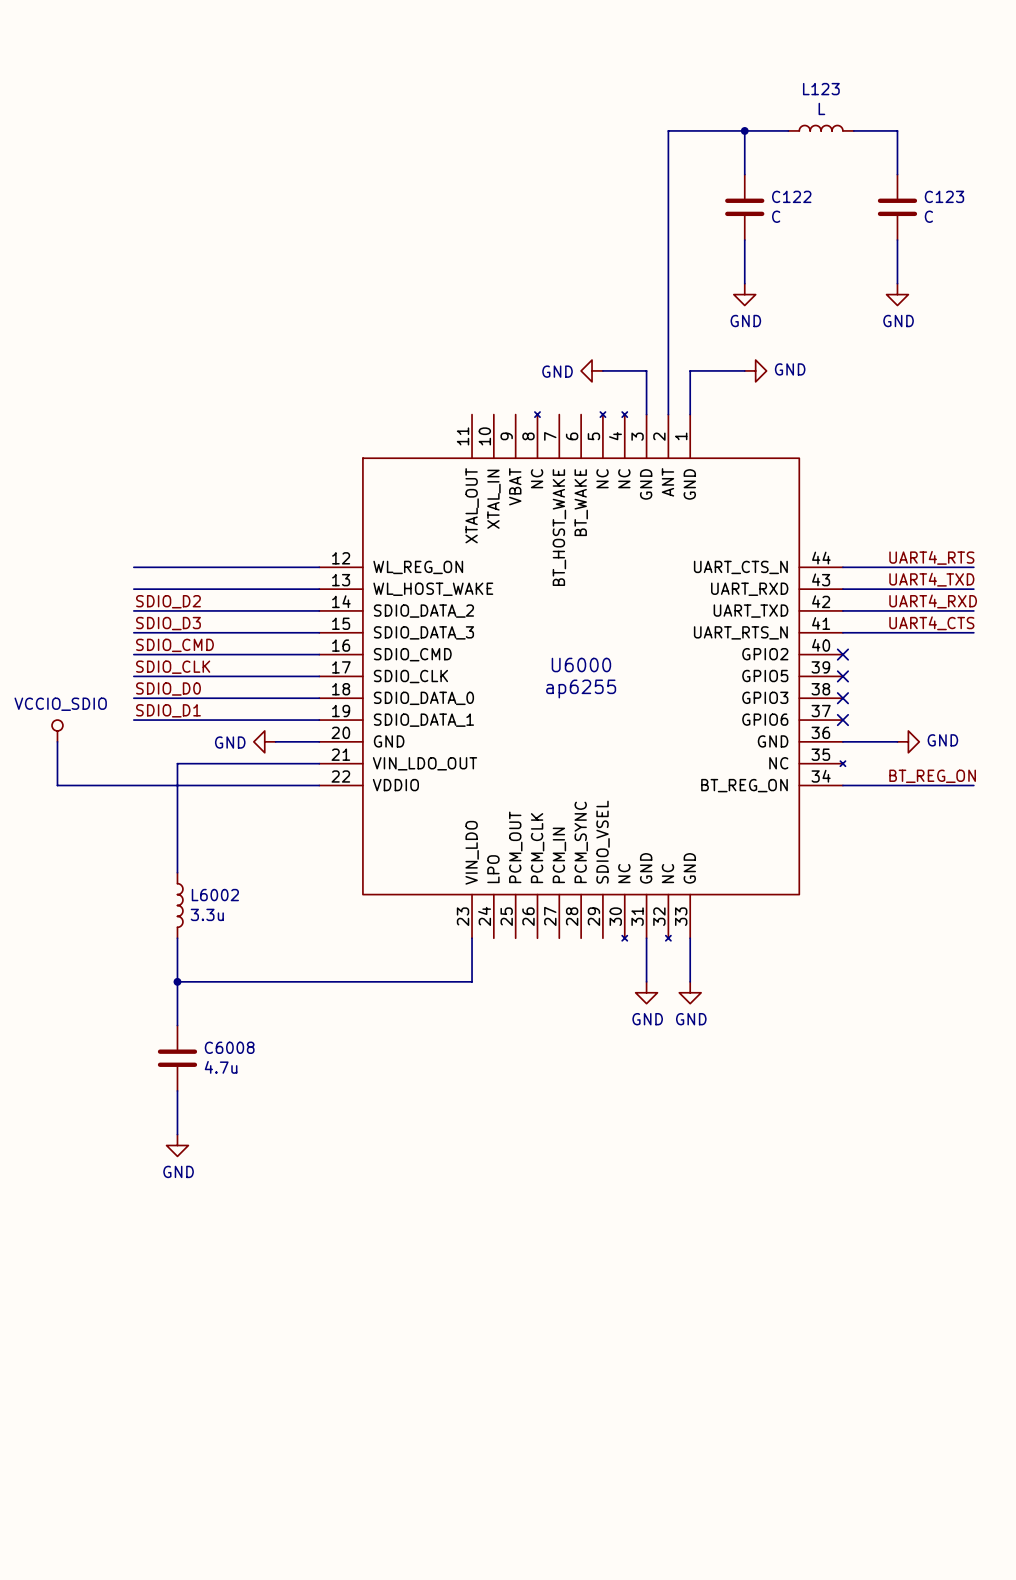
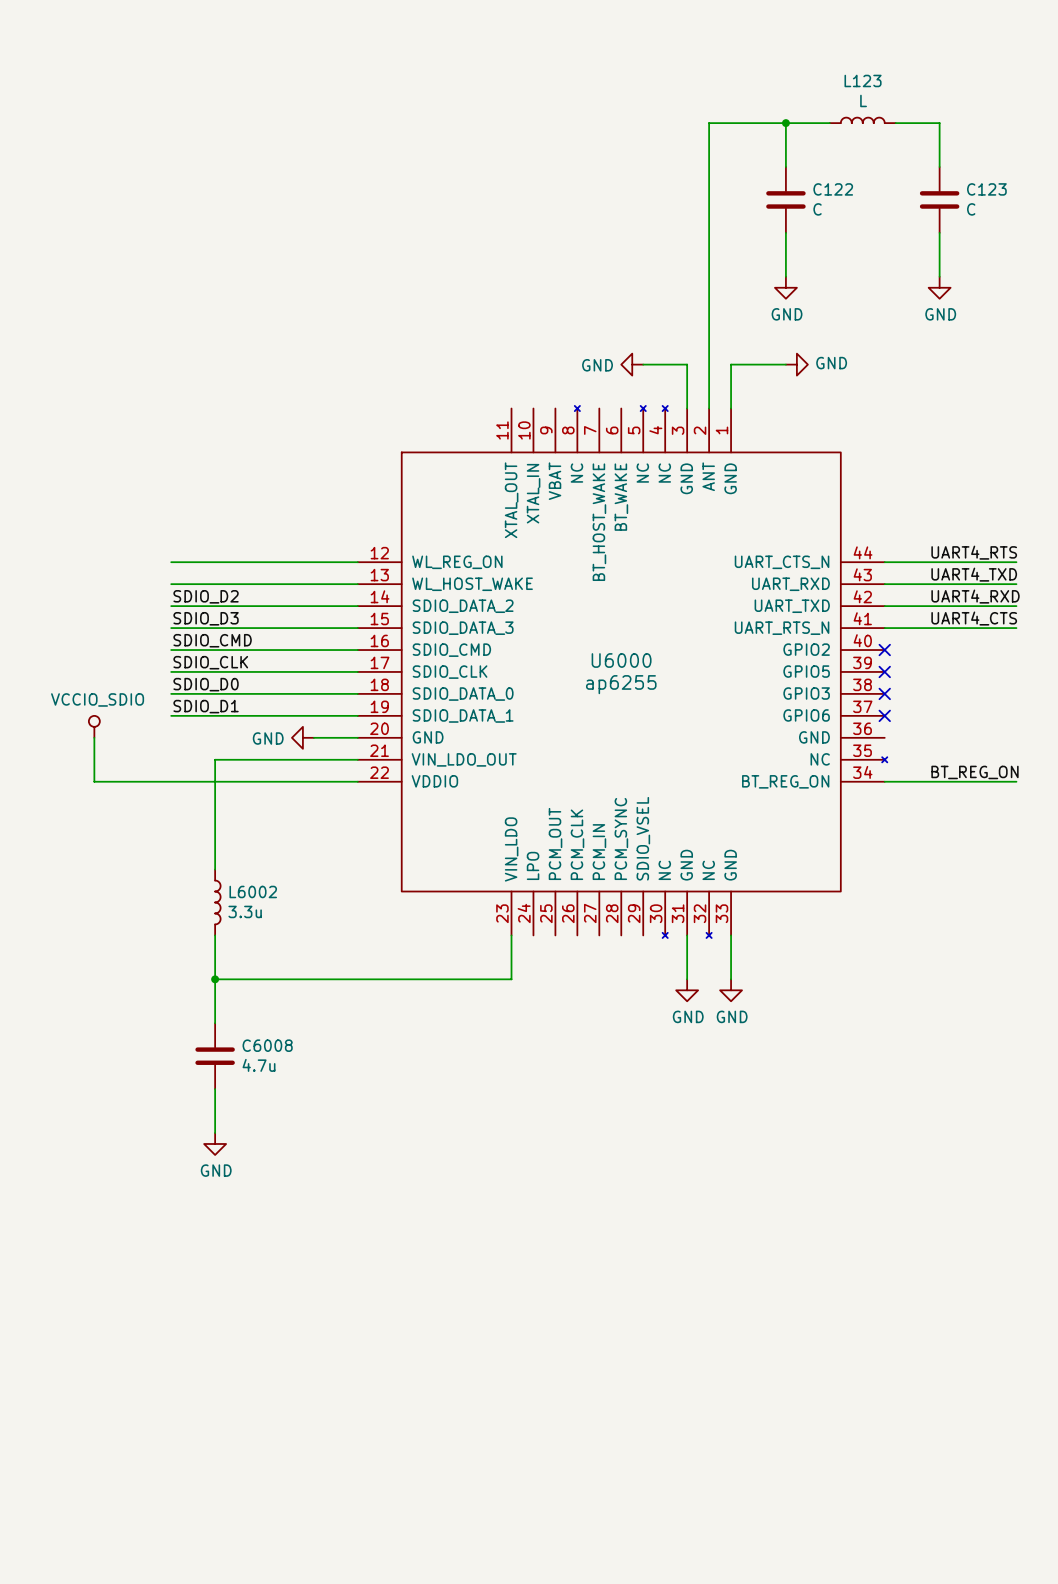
wire: (842, 741) (897, 741) -> none
power symbol: GND (908, 741) -> none

